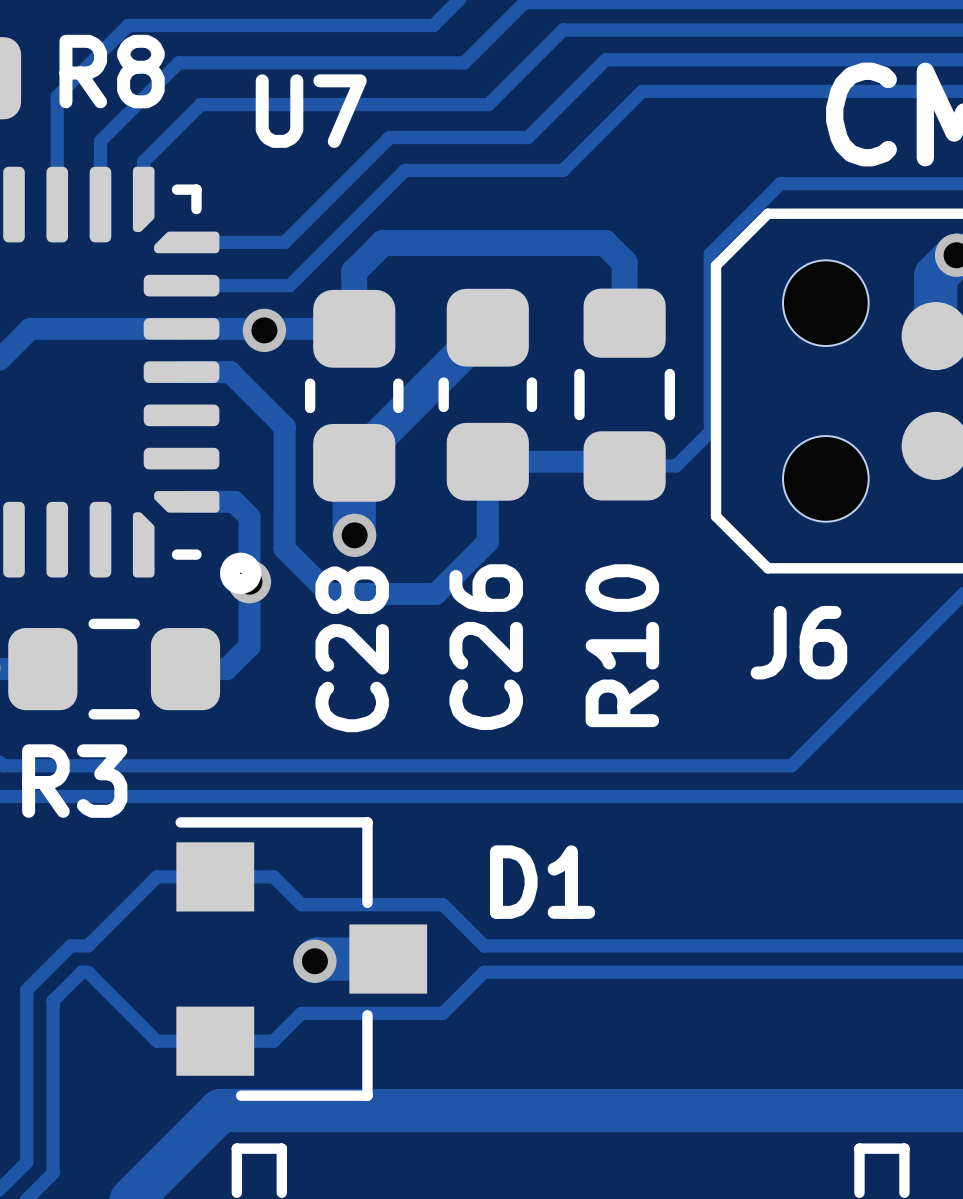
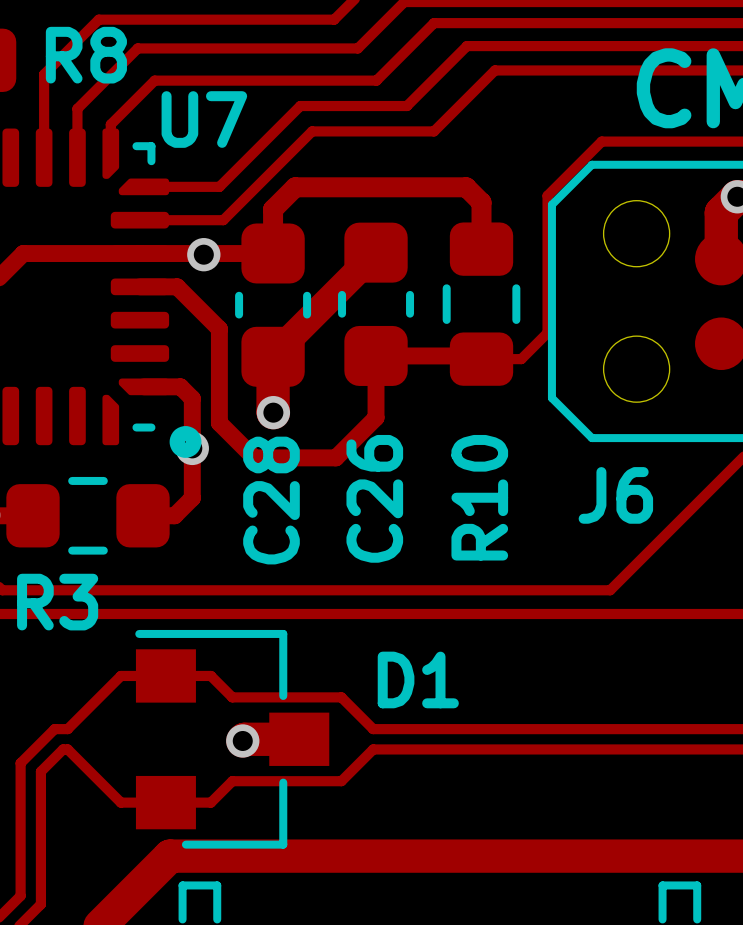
U7 name position: U7 (311, 111) -> U7 (204, 119)

